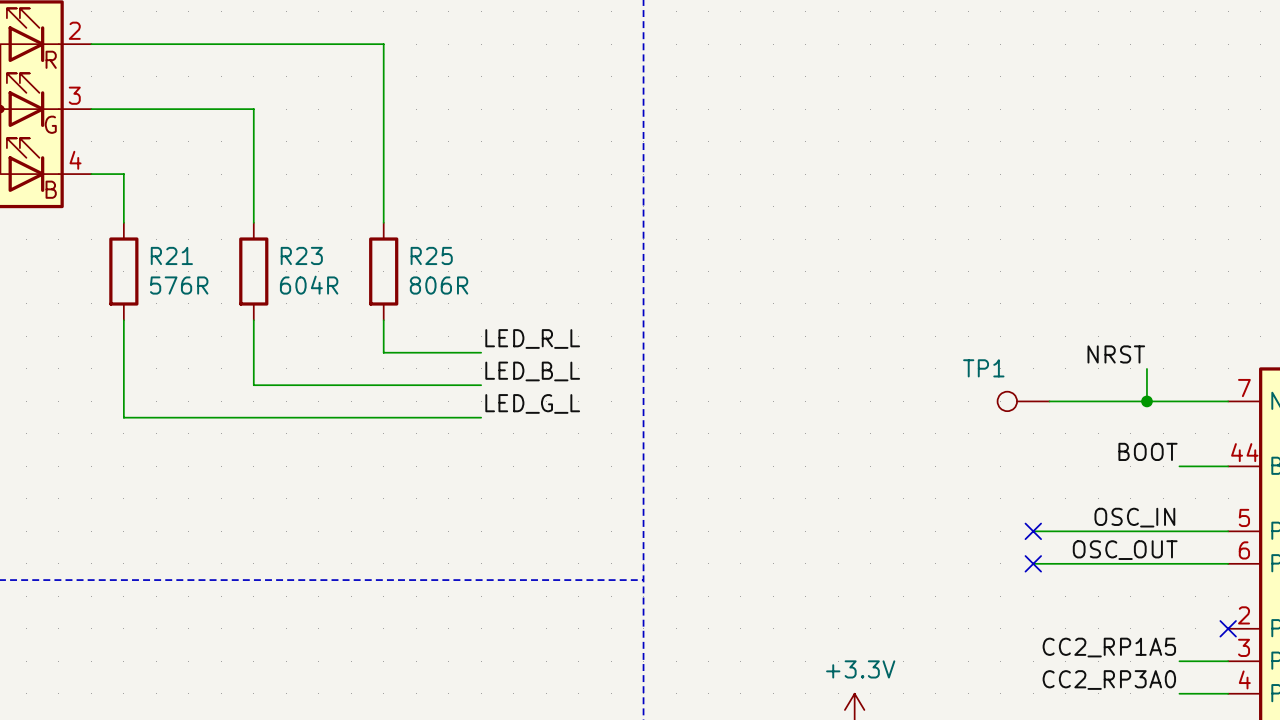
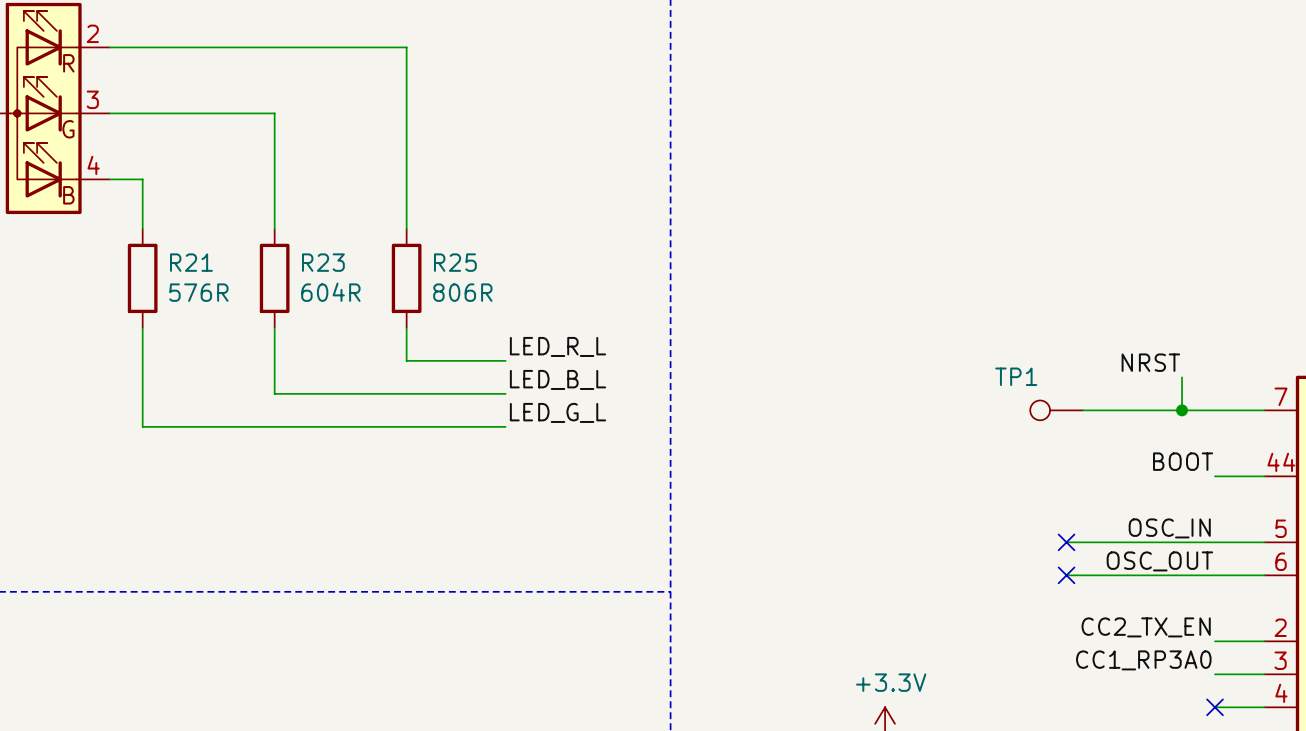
label: none -> CC2_TX_EN (1146, 627)
wire: none -> (1215, 641) (1264, 641)
no-connect mark: (1228, 628) -> none
label: CC2_RP1A5 (1109, 647) -> CC1_RP3A0 (1143, 660)
label: CC2_RP3A0 (1109, 680) -> none
no-connect mark: none -> (1215, 707)

